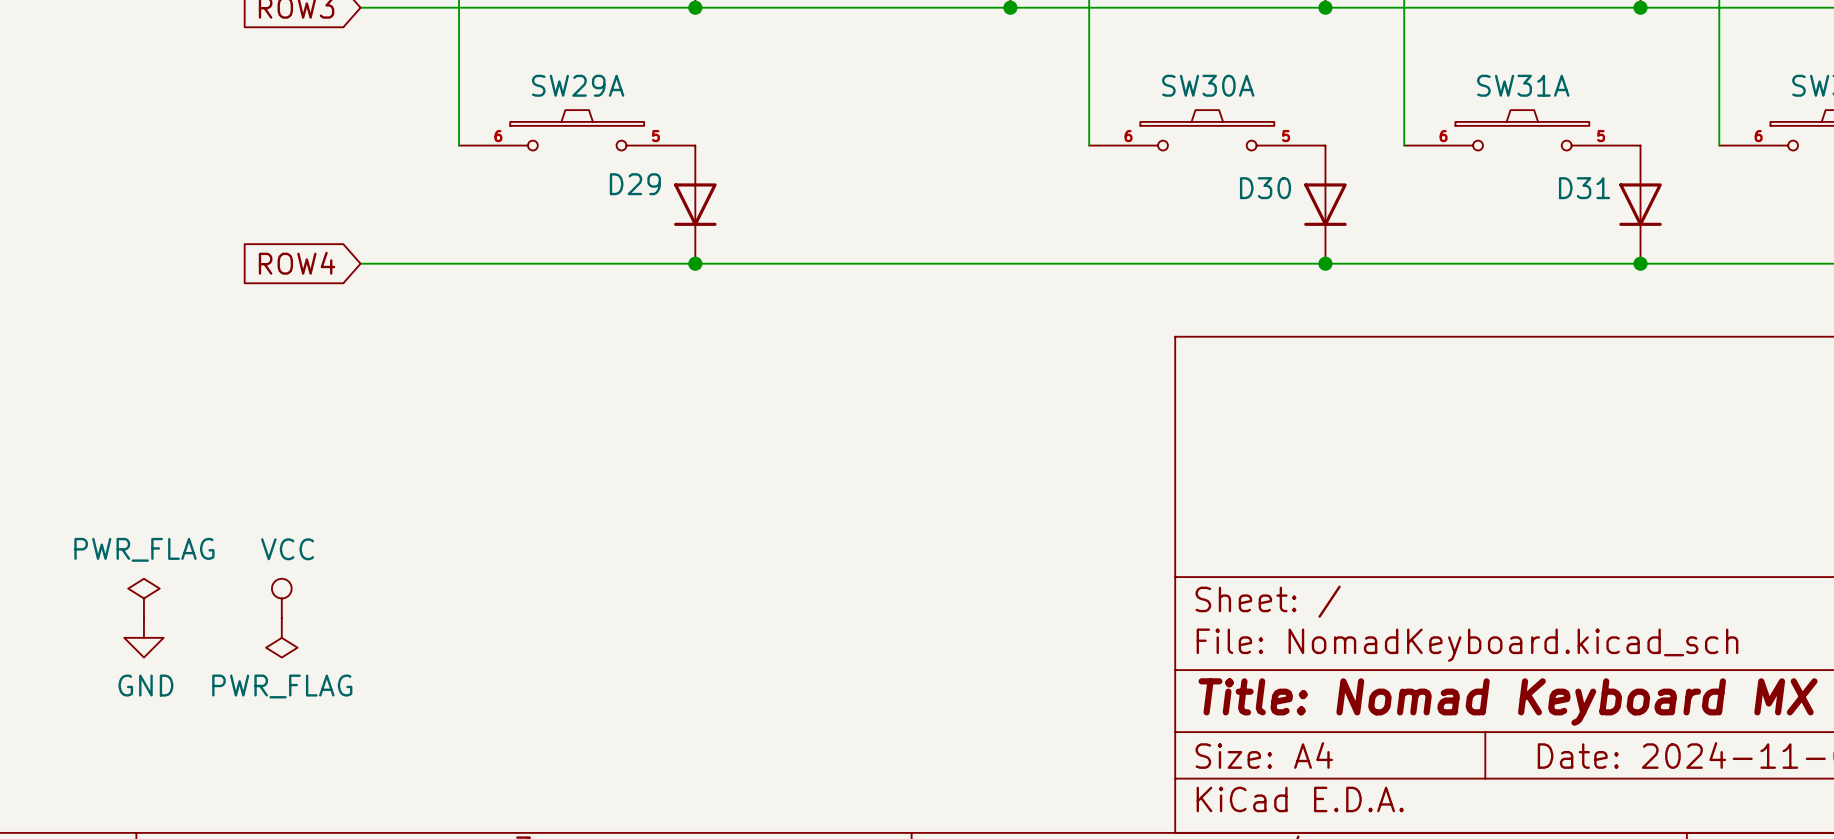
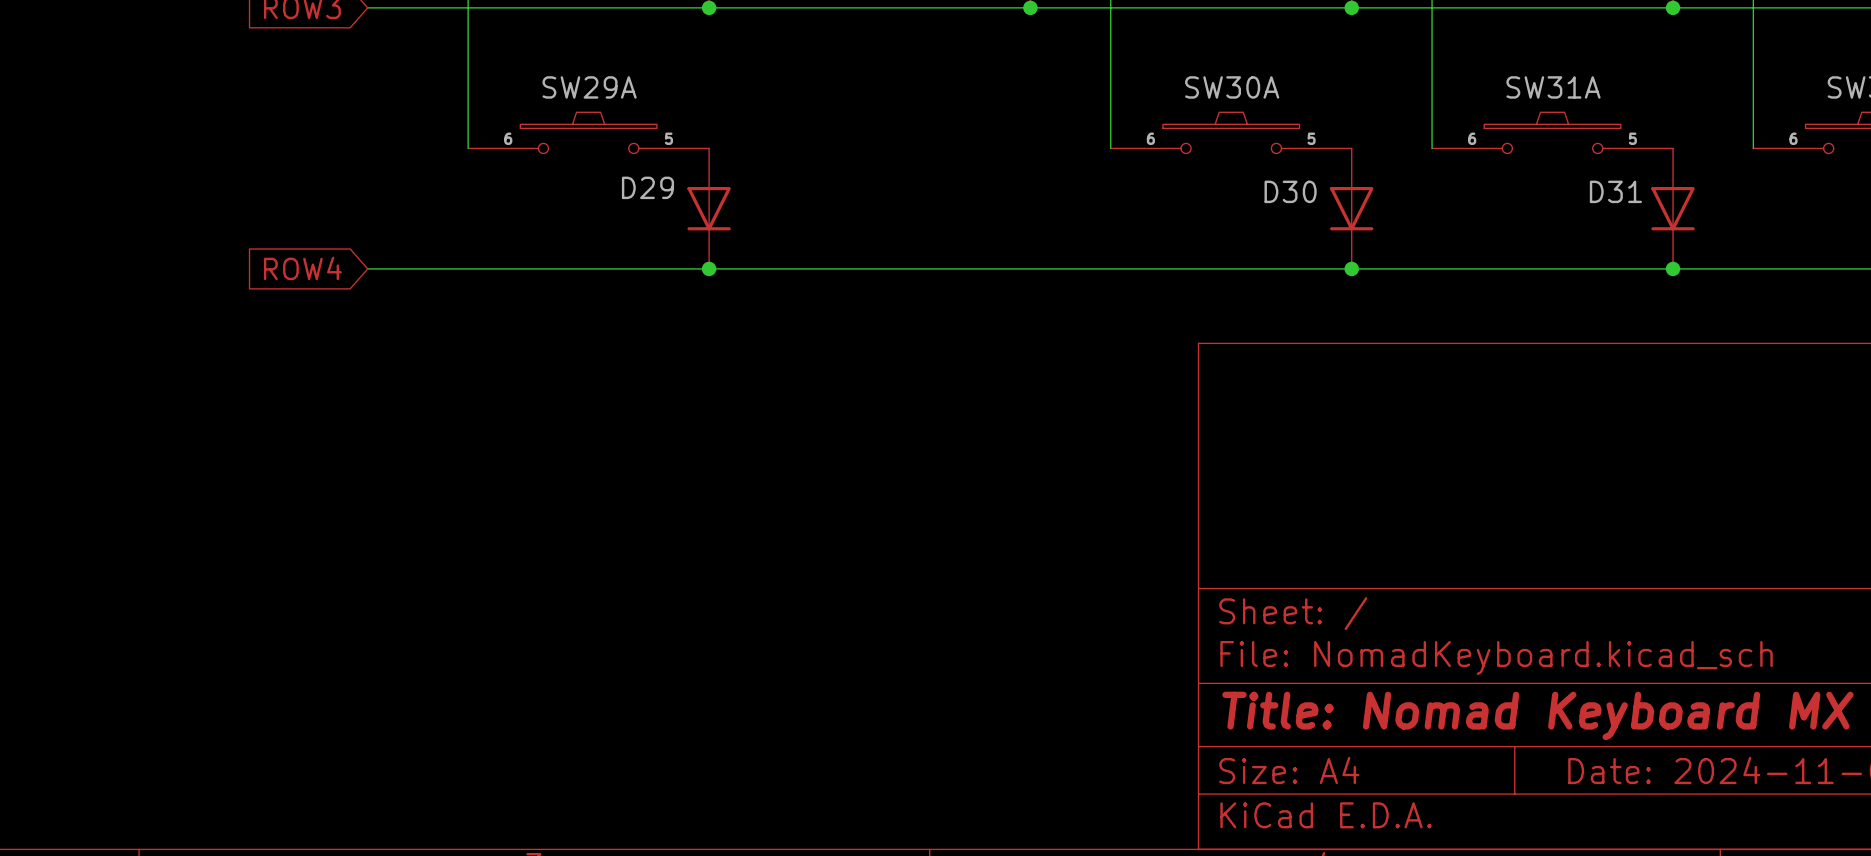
power symbol: PWR_FLAG (143, 598) -> none
power symbol: VCC (281, 598) -> none
power symbol: GND (143, 637) -> none
power symbol: PWR_FLAG (281, 637) -> none

